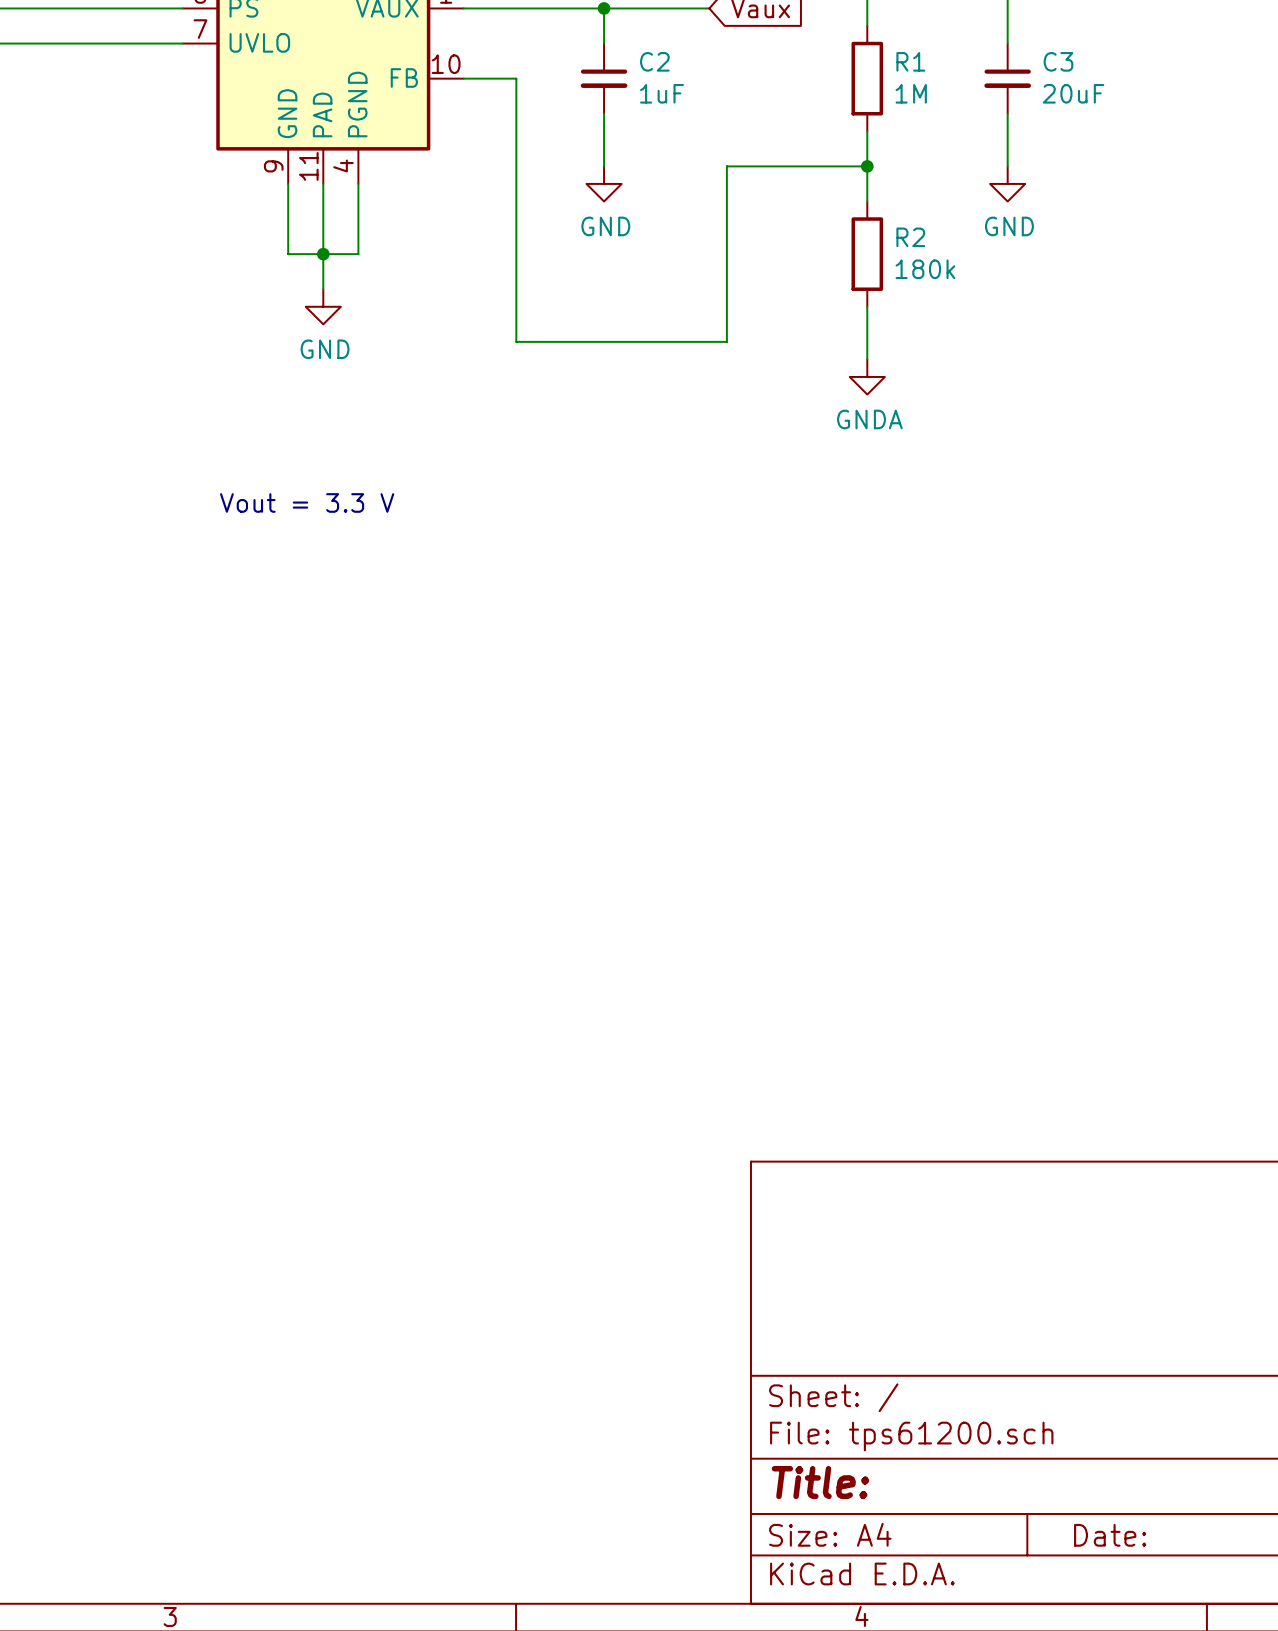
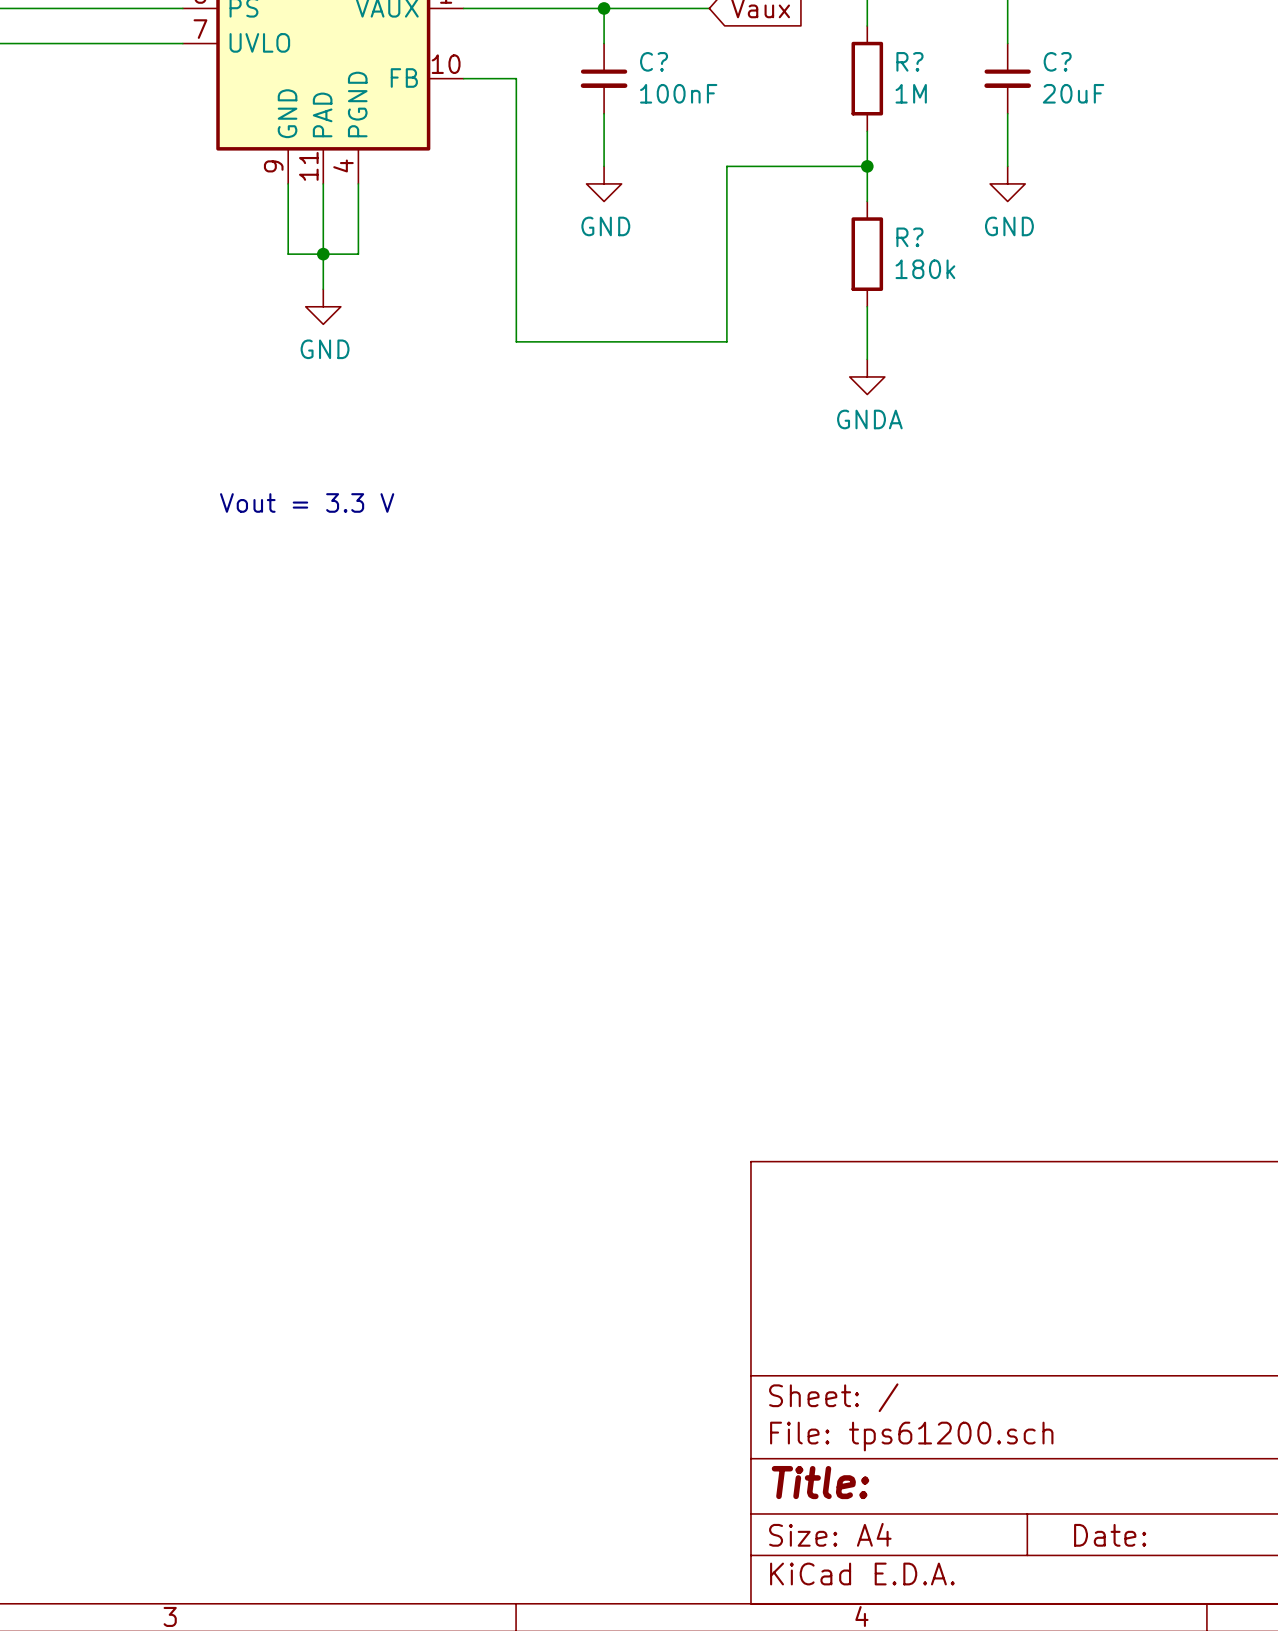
C2 name: C2 (654, 61) -> C? (654, 61)
R1 name: R1 (910, 61) -> R? (909, 61)
C3 name: C3 (1058, 61) -> C? (1057, 61)
C2 value: 1uF (661, 93) -> 100nF (678, 93)
R2 name: R2 (910, 237) -> R? (909, 237)

